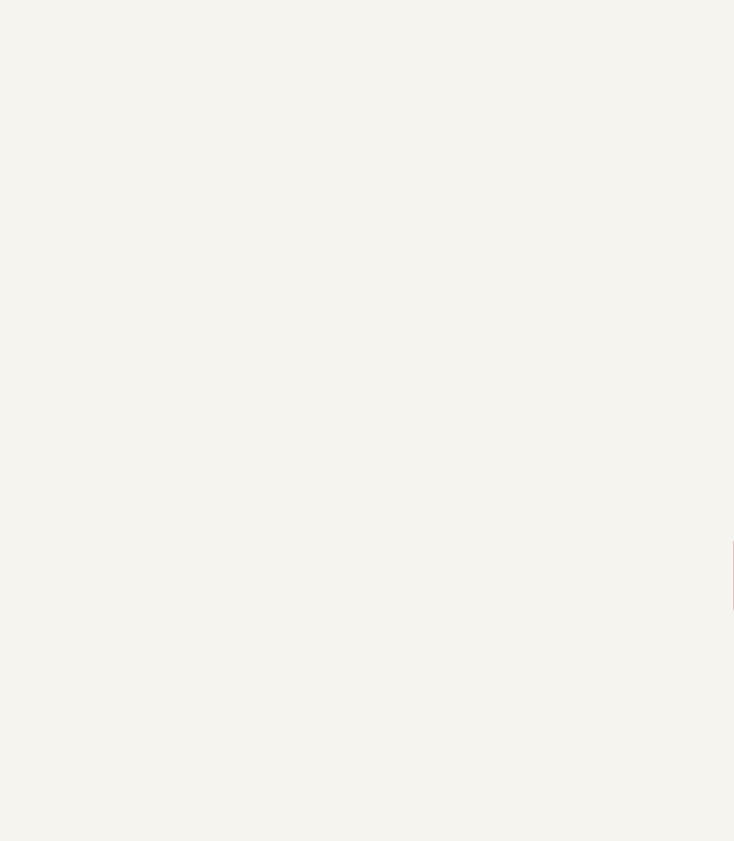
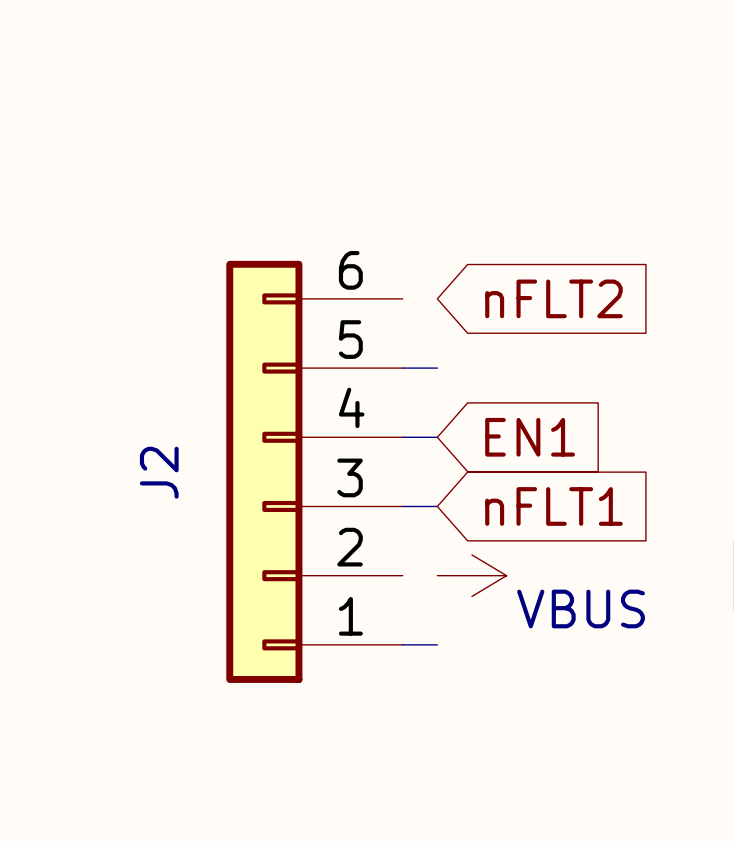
global label: none -> nFLT2 (553, 298)
wire: none -> (402, 368) (437, 368)
wire: none -> (402, 437) (437, 437)
global label: none -> EN1 (530, 437)
J2: none -> (314, 471)
wire: none -> (402, 506) (437, 506)
global label: none -> nFLT1 (553, 506)
power symbol: none -> VBUS (471, 575)
wire: none -> (402, 644) (437, 644)

